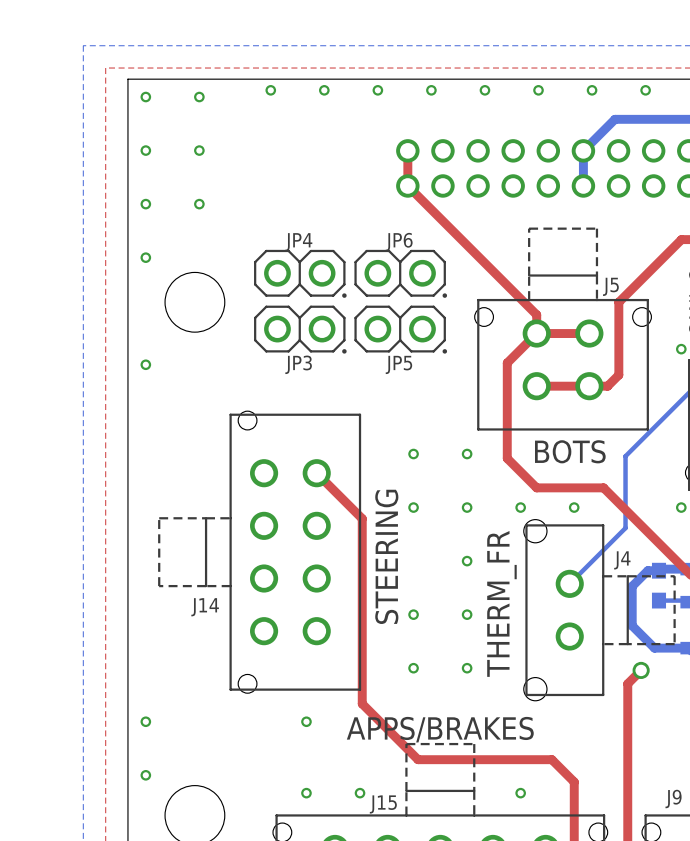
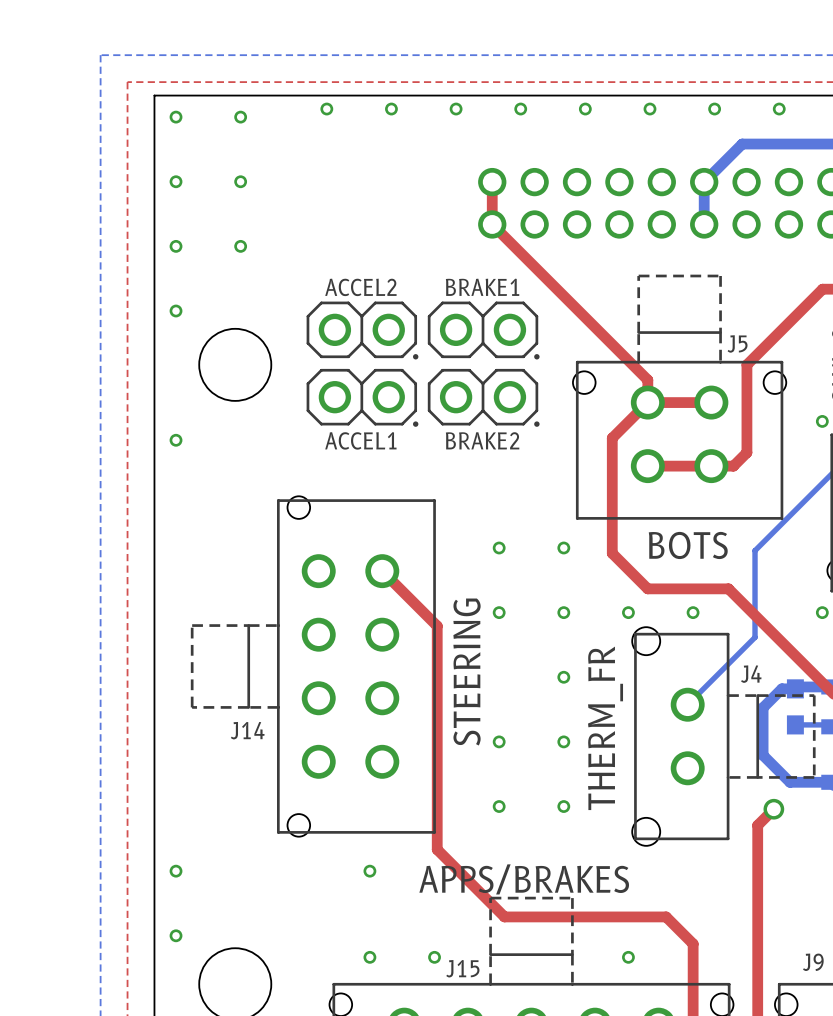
JP4 name: JP4 (298, 242) -> ACCEL2 (360, 287)
JP6 name: JP6 (399, 242) -> BRAKE1 (482, 287)
JP3 name: JP3 (298, 364) -> ACCEL1 (360, 440)
JP5 name: JP5 (398, 364) -> BRAKE2 (482, 440)

